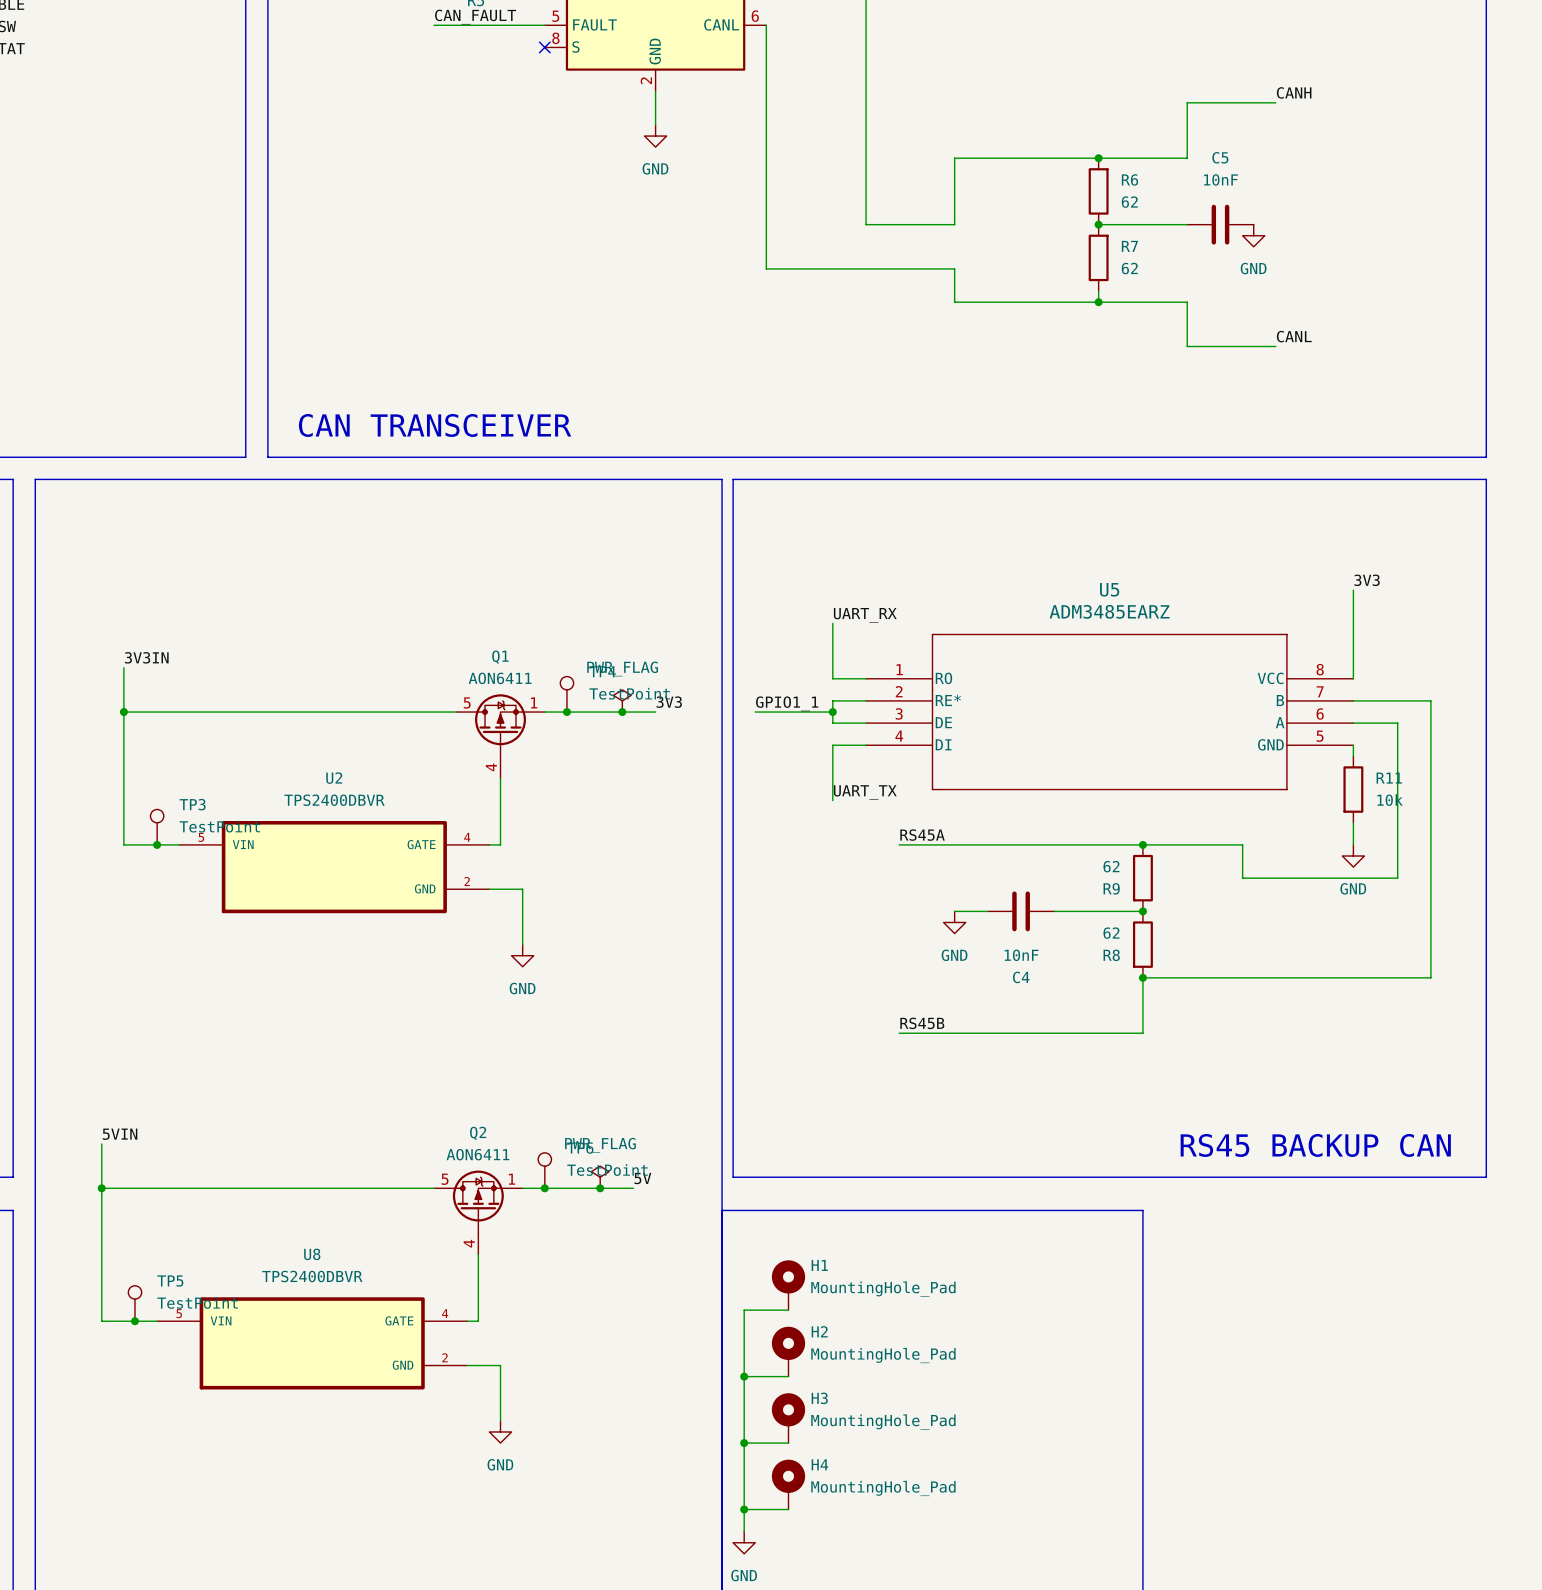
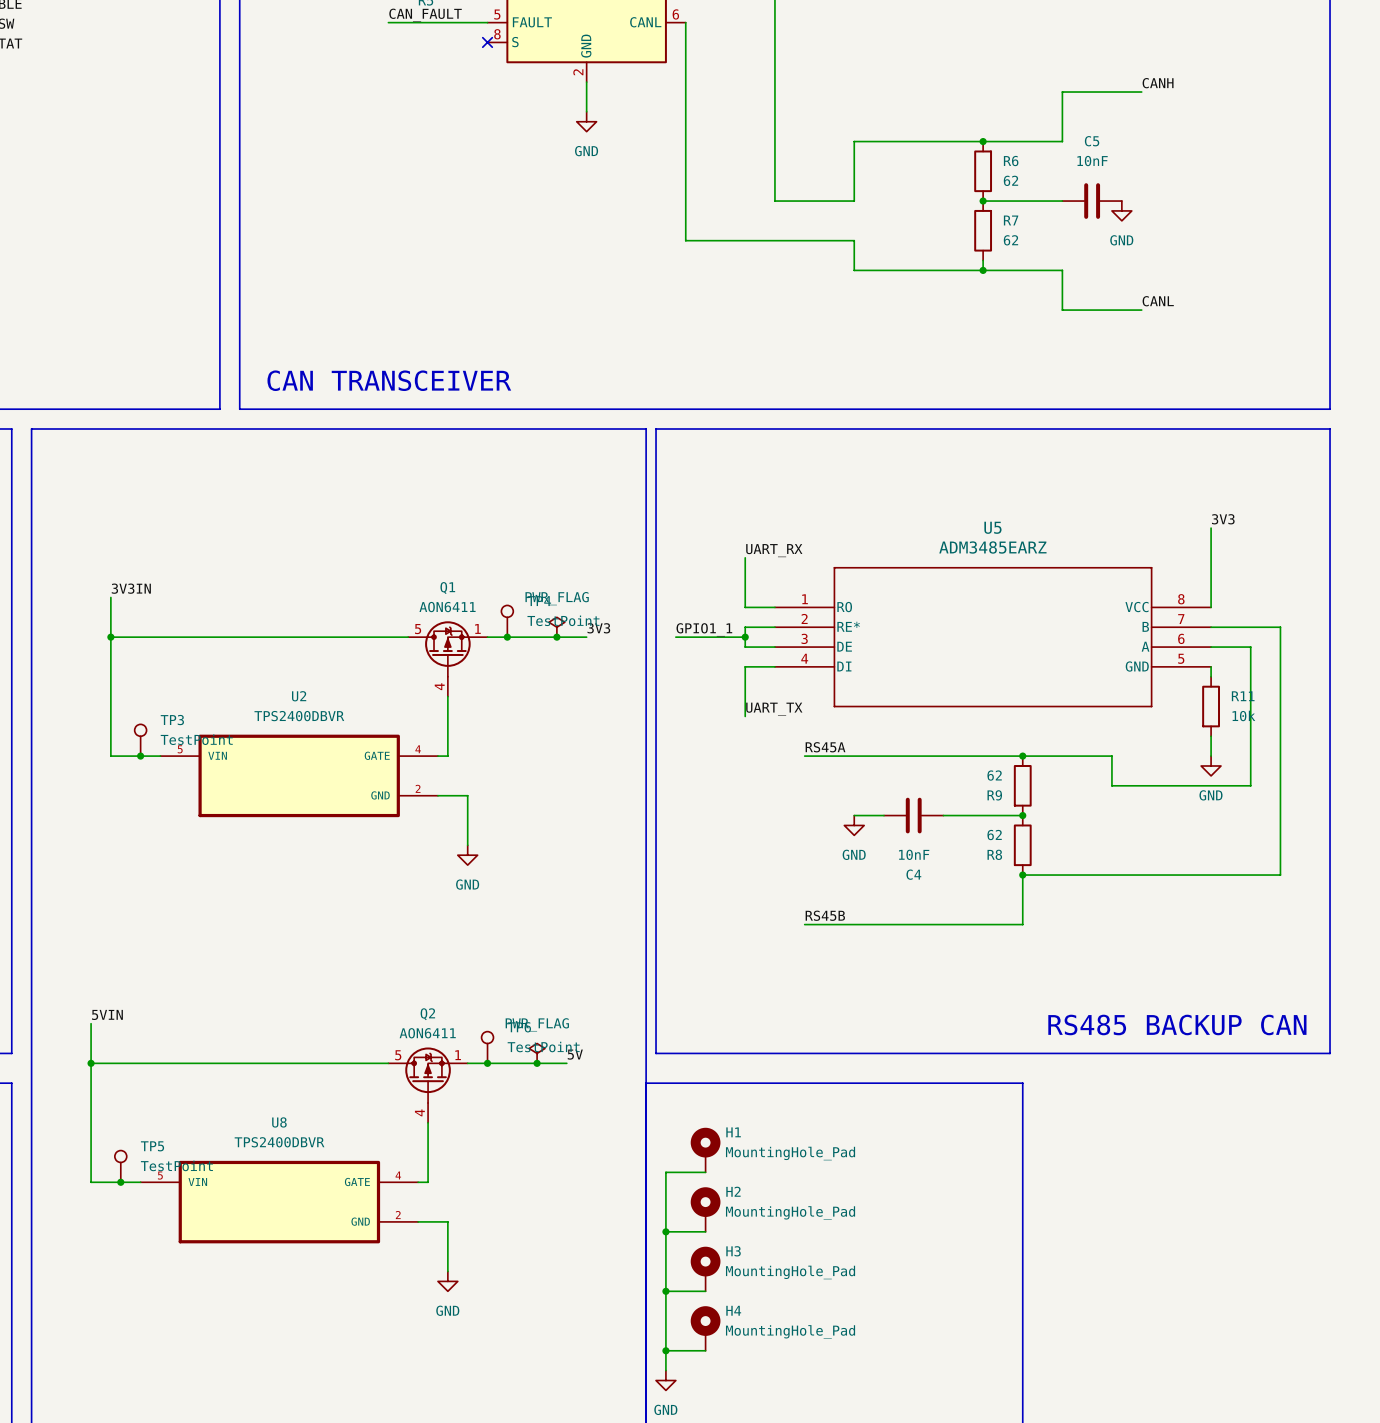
text: RS45 BACKUP CAN (1315, 1145) -> RS485 BACKUP CAN (1177, 1024)

